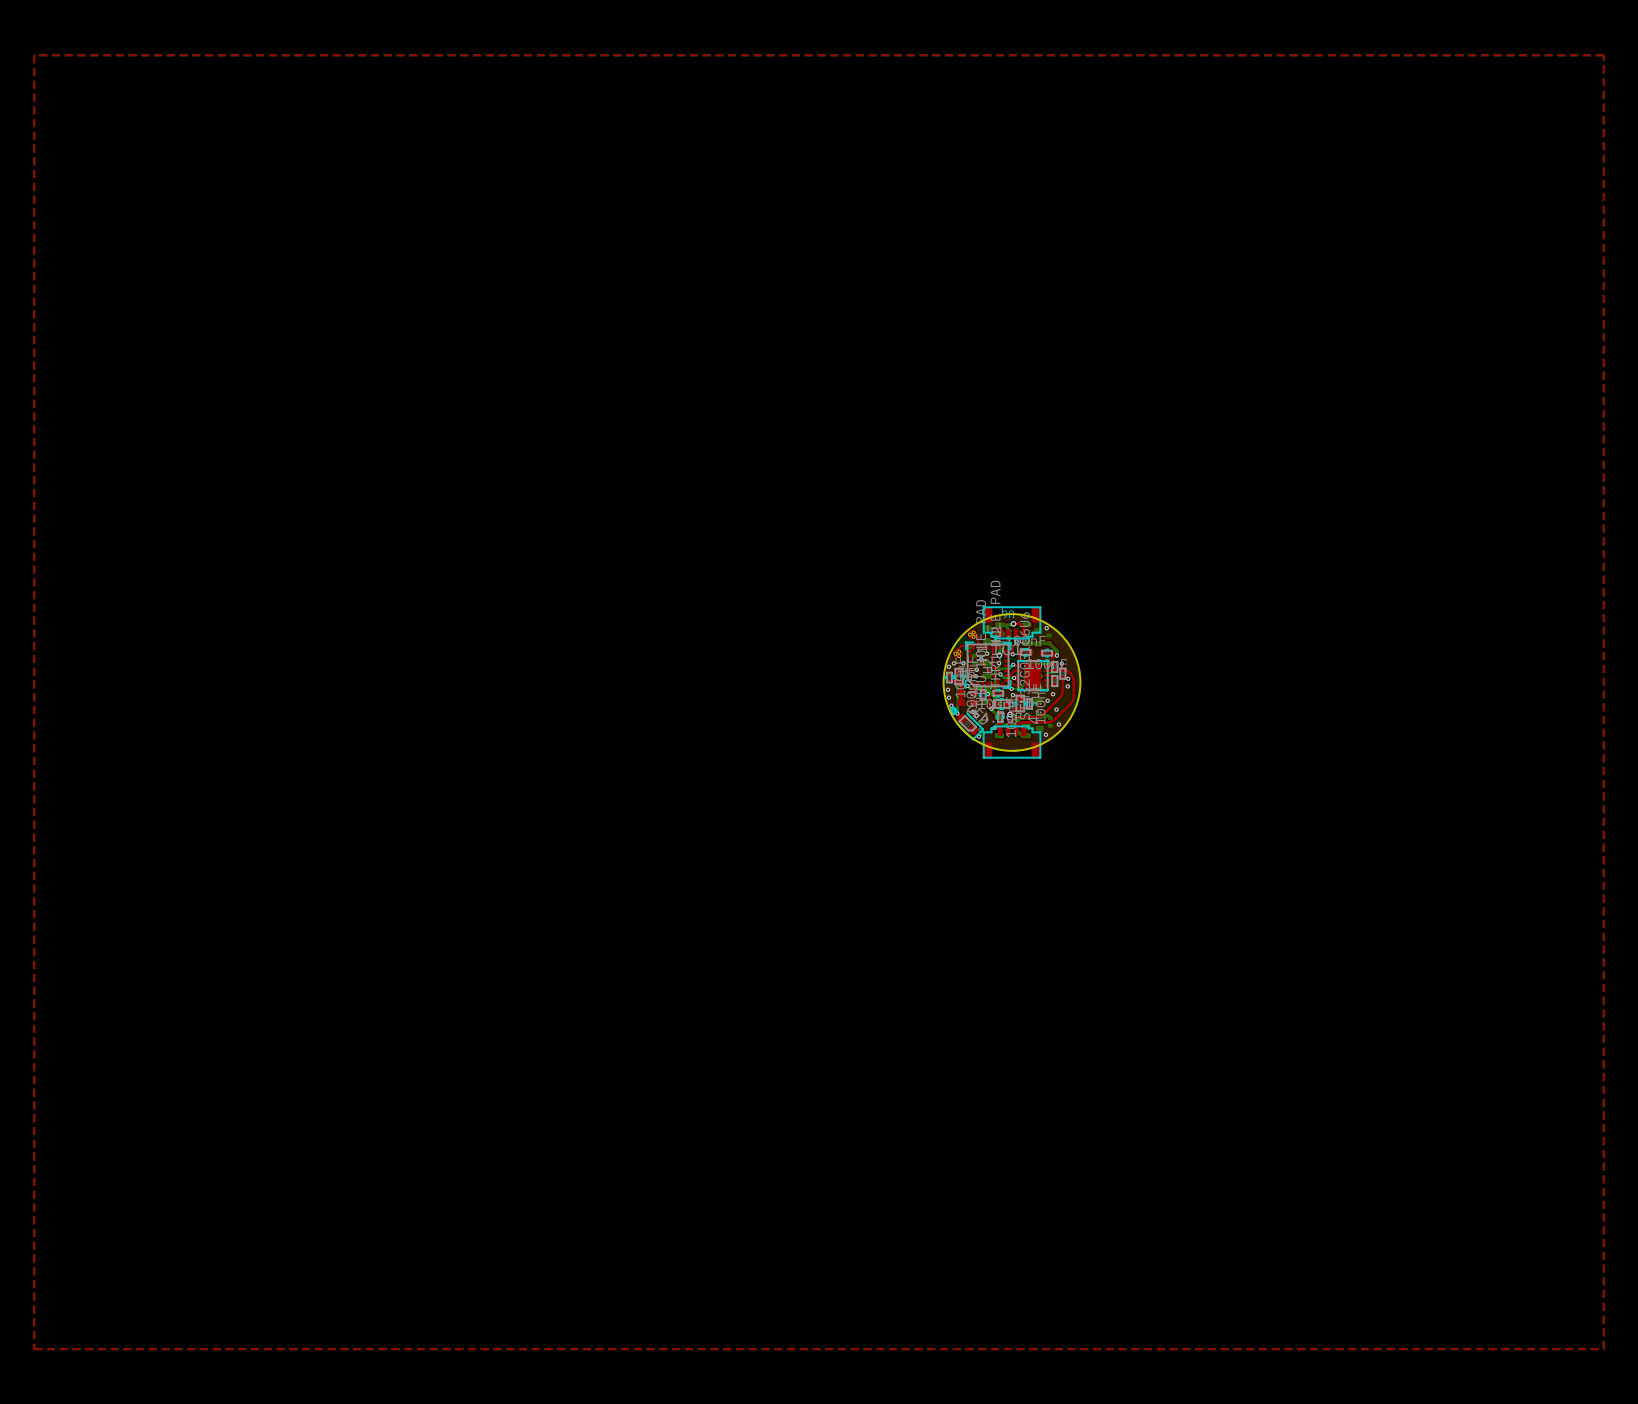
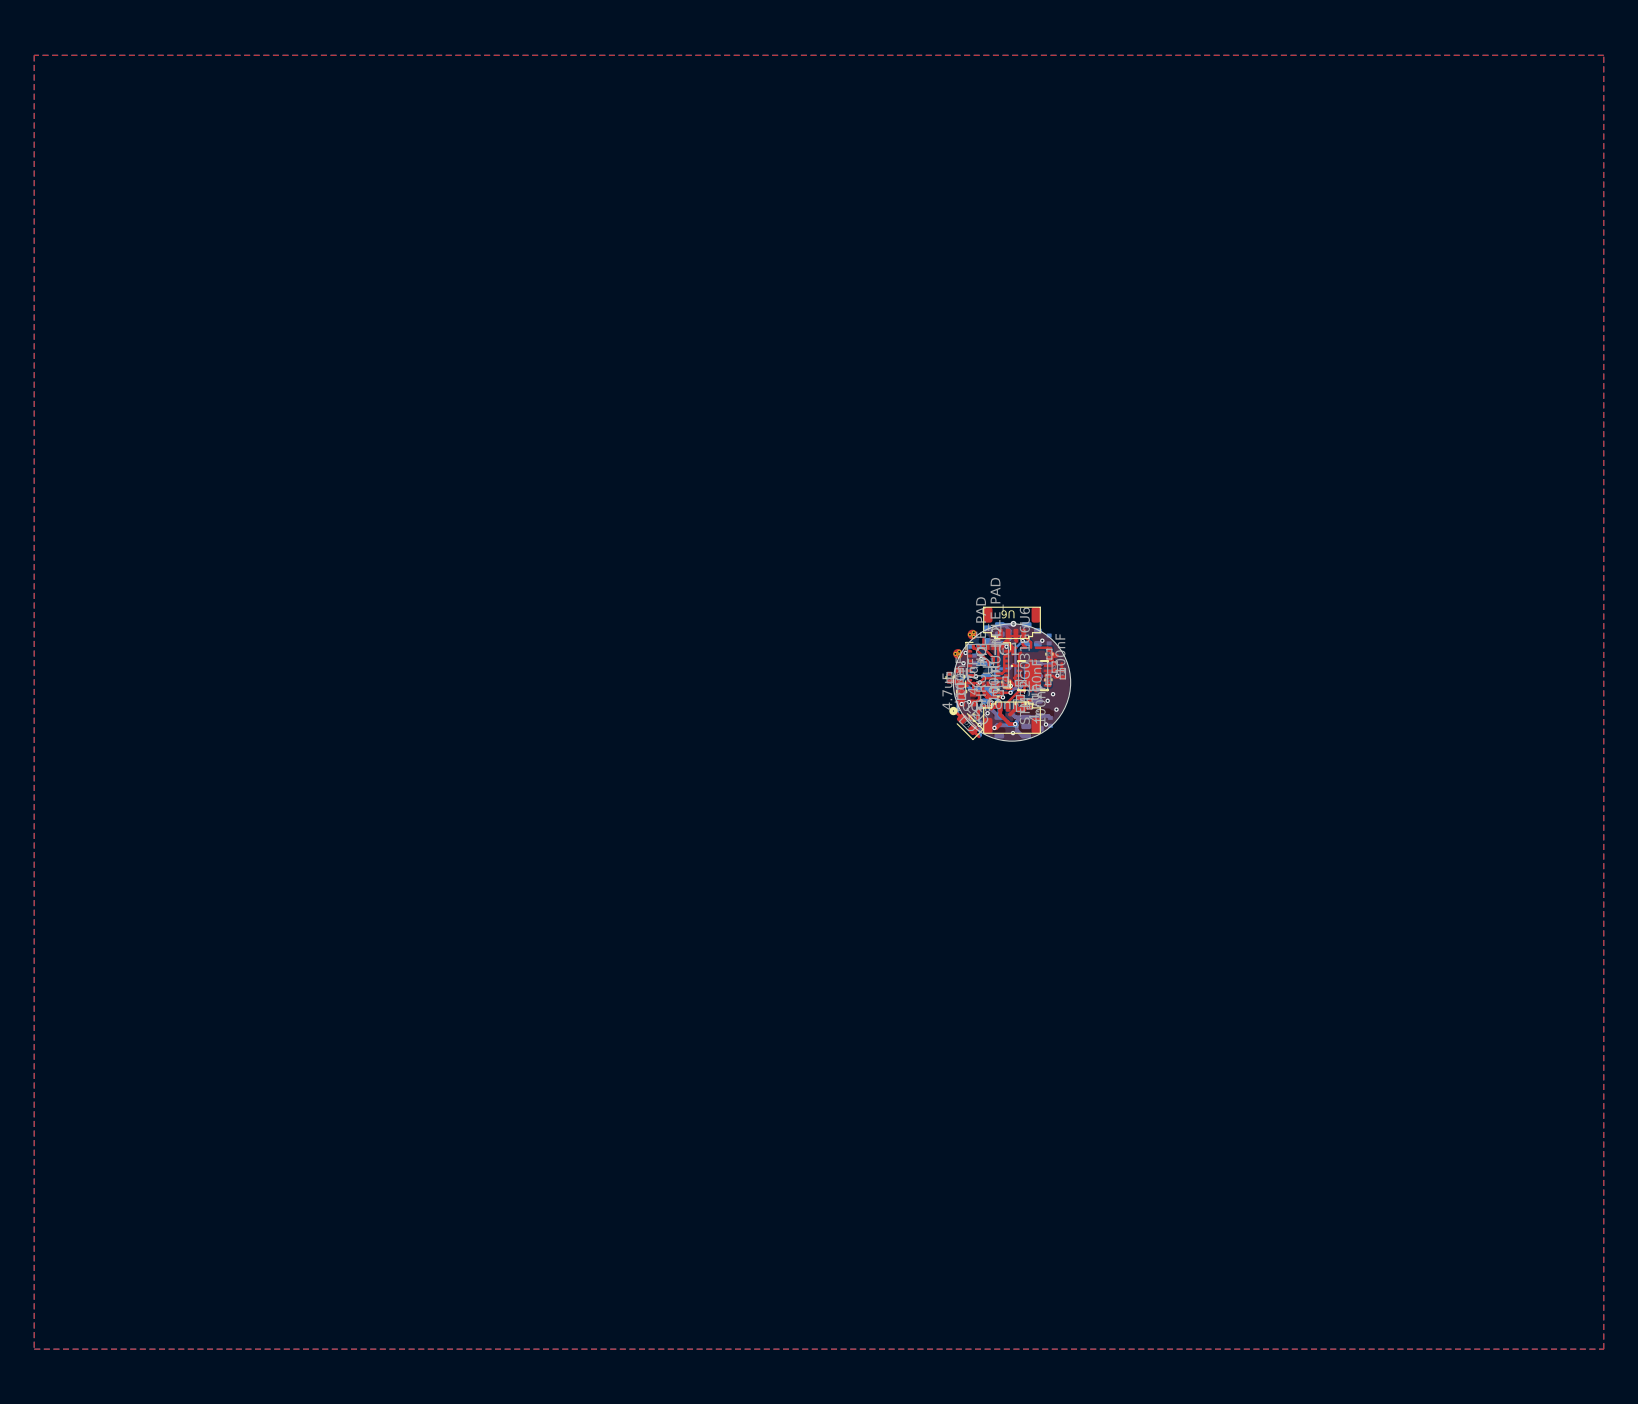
round board edge size: [943, 613, 1081, 752] -> [952, 623, 1072, 742]
top track: (1013, 623) (1020, 623) (1023, 627) (1023, 633) -> none
via: (1046, 628) -> none
top track: (973, 632) (978, 636) (978, 647) -> none
top track: none -> (983, 638) (983, 647) (993, 658) (993, 663)
top track: none -> (1022, 640) (1022, 644) (1026, 647) (1021, 647)
bottom track: none -> (1022, 640) (1015, 648) (1015, 687) (1010, 692)
via: none -> (1022, 640)
via: none -> (1042, 640)
via: (1016, 641) -> none
bottom track: (999, 643) (999, 655) -> none
bottom track: (1026, 643) (1049, 643) (1056, 650) (1056, 655) -> none
top track: none -> (972, 646) (988, 662) (988, 665)
via: none -> (1006, 646)
top track: (973, 647) (961, 645) (957, 649) (957, 653) -> none
top track: (992, 647) (992, 666) (1000, 674) -> none
top track: none -> (1016, 647) (1013, 647) (1004, 656) (1004, 671) (996, 673)
top track: none -> (1031, 647) (1031, 642) (1024, 636) (1010, 636) (998, 648) (998, 668)
top track: none -> (1035, 647) (1049, 649)
via: none -> (965, 652)
part rotation: 0° (1025, 652) -> 90° clockwise (1049, 654)
part position: (1025, 652) -> (1049, 654)
via: (987, 653) -> none
part rotation: 0° (1047, 653) -> 90° clockwise (1048, 679)
part position: (1047, 653) -> (1048, 679)
via: (1012, 654) -> none
via: (999, 655) -> none
via: (1056, 655) -> none
top track: (981, 659) (981, 663) (997, 680) (997, 684) -> none
via: (953, 663) -> none
via: (999, 663) -> none
via: (1061, 663) -> none
via: (1013, 664) -> none
via: (948, 666) -> none
via: (976, 669) -> none
top track: (1019, 670) (1014, 670) (1009, 675) (1006, 675) -> none
top track: (1062, 670) (1066, 670) (1073, 679) (1073, 696) (1071, 703) (1052, 720) (1020, 722) (1016, 725) (1015, 731) -> none
bottom track: (1000, 674) (1004, 678) (1014, 678) -> none
via: (1000, 674) -> none
top track: none -> (1026, 675) (1024, 691) (1018, 691) (1008, 702) (1008, 706)
via: none -> (1057, 675)
top track: none -> (1005, 678) (983, 678) (979, 683) (964, 683) (961, 686)
via: (1014, 678) -> none
top track: (1068, 678) (1062, 677) (1061, 695) (1043, 714) (1036, 717) (1015, 718) (1008, 724) (1008, 731) -> none
via: (1068, 678) -> none
part rotation: 0° (1054, 681) -> 90° clockwise (1020, 683)
part position: (1054, 681) -> (1020, 683)
via: none -> (979, 682)
via: (967, 685) -> none
via: none -> (1010, 685)
via: (1067, 686) -> none
via: (1011, 688) -> none
via: (948, 689) -> none
top track: none -> (979, 691) (979, 699) (976, 701)
top track: none -> (983, 691) (986, 697) (1002, 697)
top track: none -> (993, 692) (1010, 692)
via: none -> (1010, 692)
via: (987, 693) -> none
part position: (983, 695) -> (1005, 681)
via: (1012, 695) -> none
via: (948, 697) -> none
via: none -> (1002, 697)
via: none -> (969, 702)
via: none -> (961, 703)
part rotation: 0° (1001, 703) -> 90° clockwise (961, 691)
part position: (1001, 703) -> (961, 691)
via: (951, 705) -> none
via: (991, 708) -> none
via: (973, 711) -> none
via: (957, 713) -> none
via: none -> (987, 713)
via: (1010, 714) -> none
via: (976, 715) -> none
top track: none -> (978, 717) (978, 710) (982, 706) (1000, 706) (1000, 714) (1009, 724) (1015, 724)
part rotation: 0° (1000, 717) -> 90° clockwise (974, 717)
part position: (1000, 717) -> (974, 717)
via: none -> (979, 724)
via: none -> (1015, 724)
via: none -> (1045, 724)
via: (1058, 724) -> none
via: none -> (1012, 733)
via: (1045, 734) -> none
via: (979, 736) -> none
part position: (1012, 742) -> (1012, 717)

